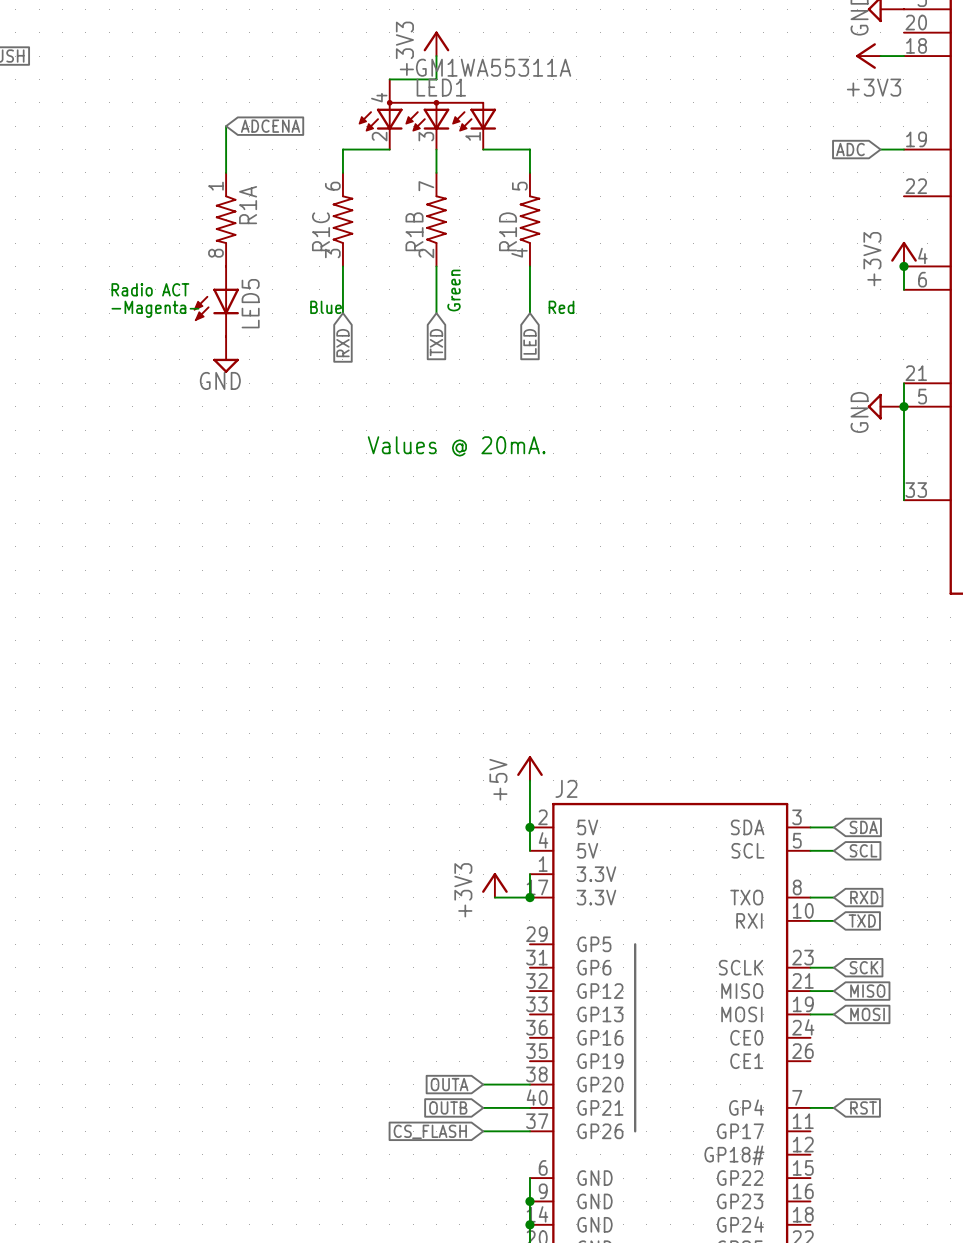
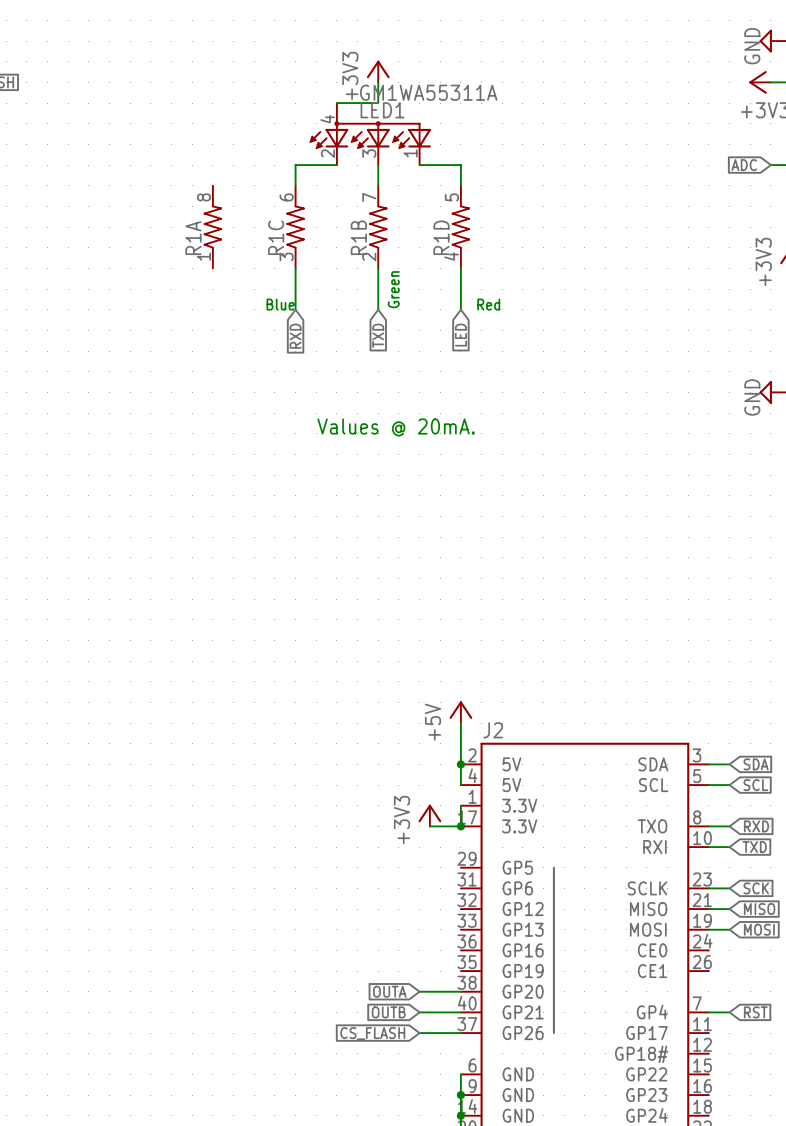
wire: (226, 126) (226, 172) -> none
global label: ADCENA (270, 126) -> none
R1A rotation: 0° (226, 219) -> 180° (212, 227)
text: Radio ACT (150, 289) -> none
LED5: (216, 301) -> none
text: -Magenta- (155, 309) -> none
power symbol: GND (226, 354) -> none

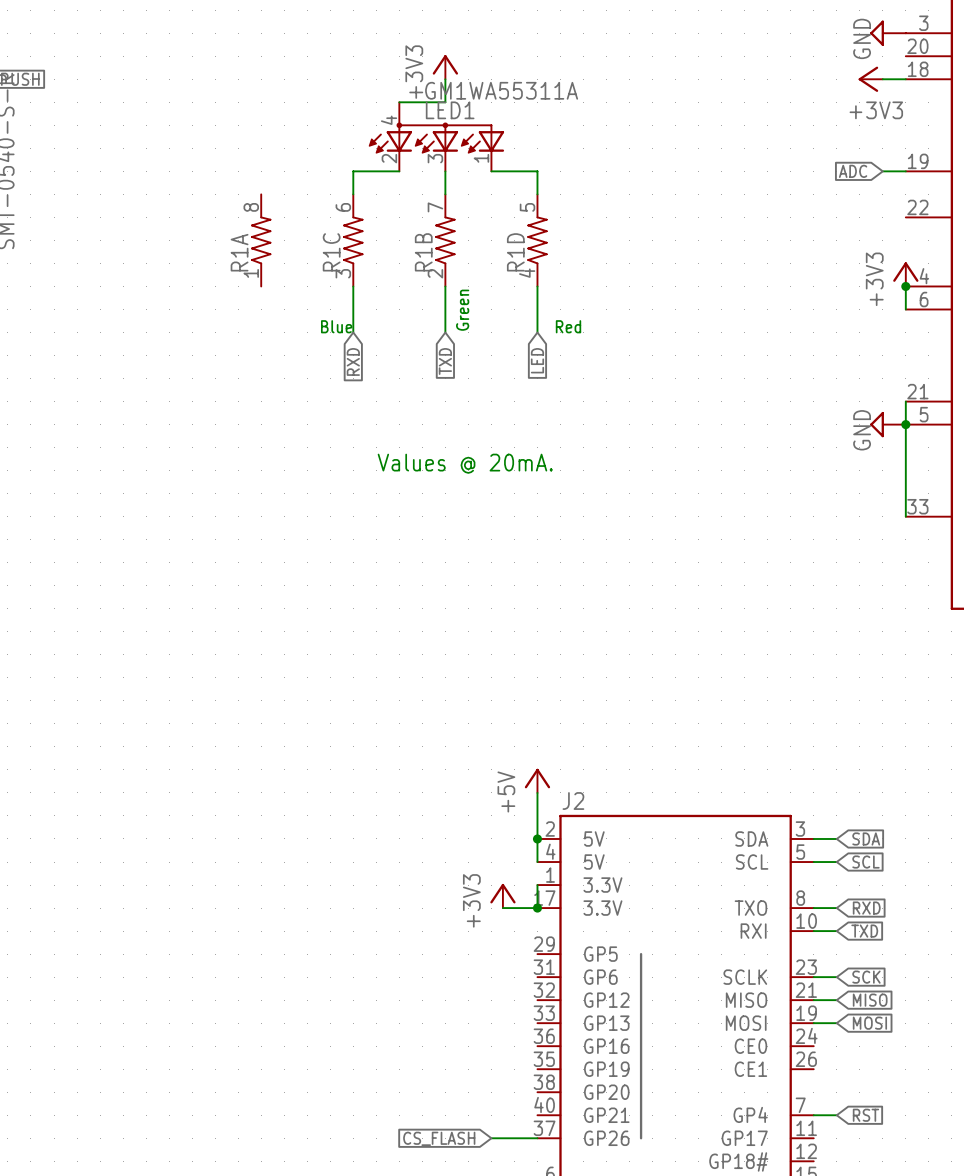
global label: OUTA (389, 991) -> none
wire: (419, 991) (460, 991) -> none
global label: OUTB (388, 1012) -> none
wire: (419, 1012) (460, 1012) -> none

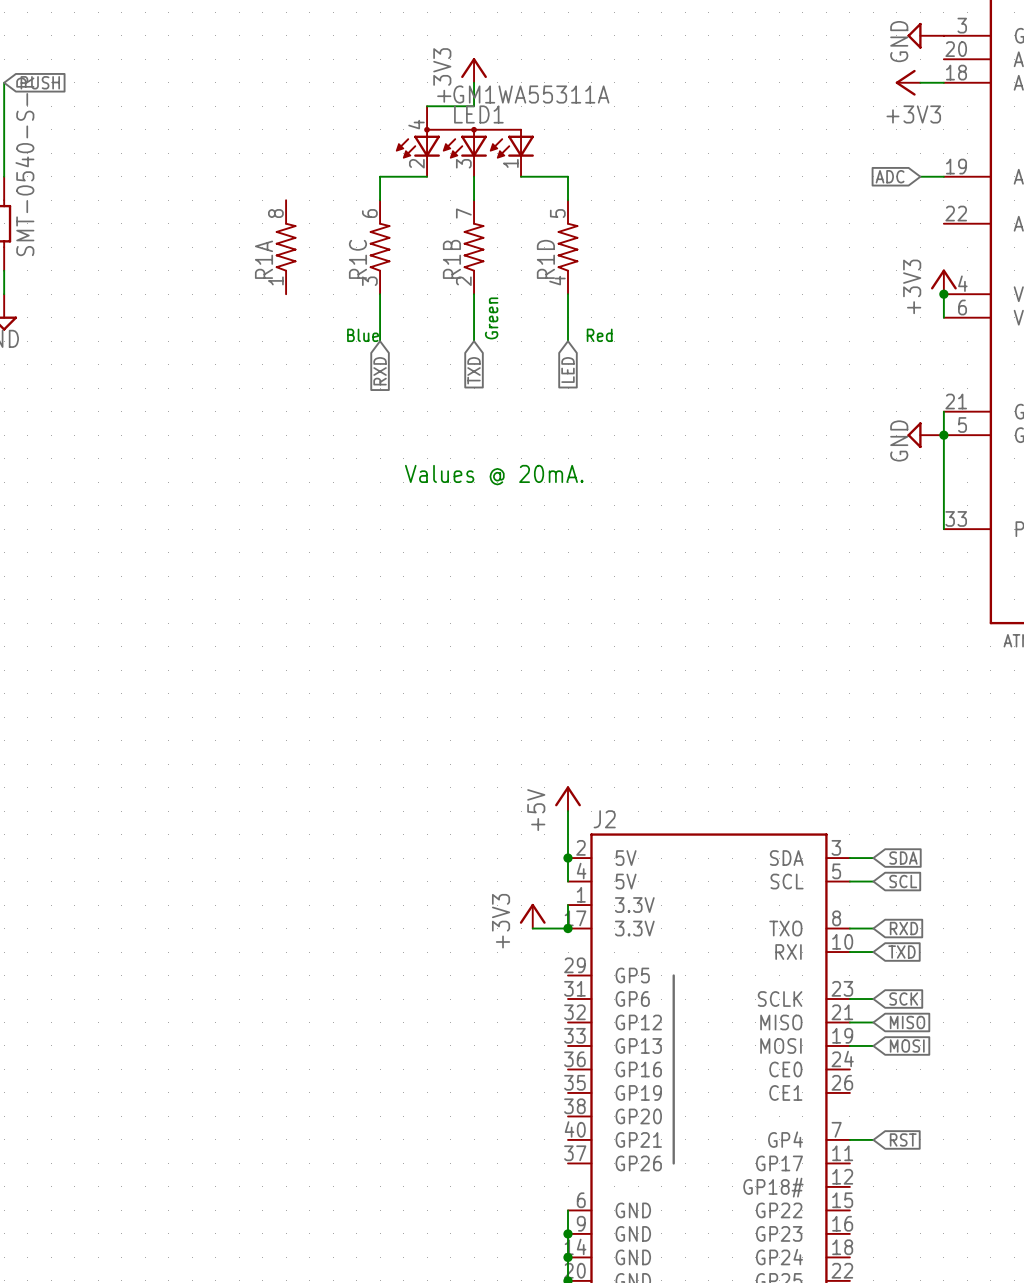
global label: CS_FLASH (439, 1138) -> none
wire: (491, 1138) (537, 1138) -> none

